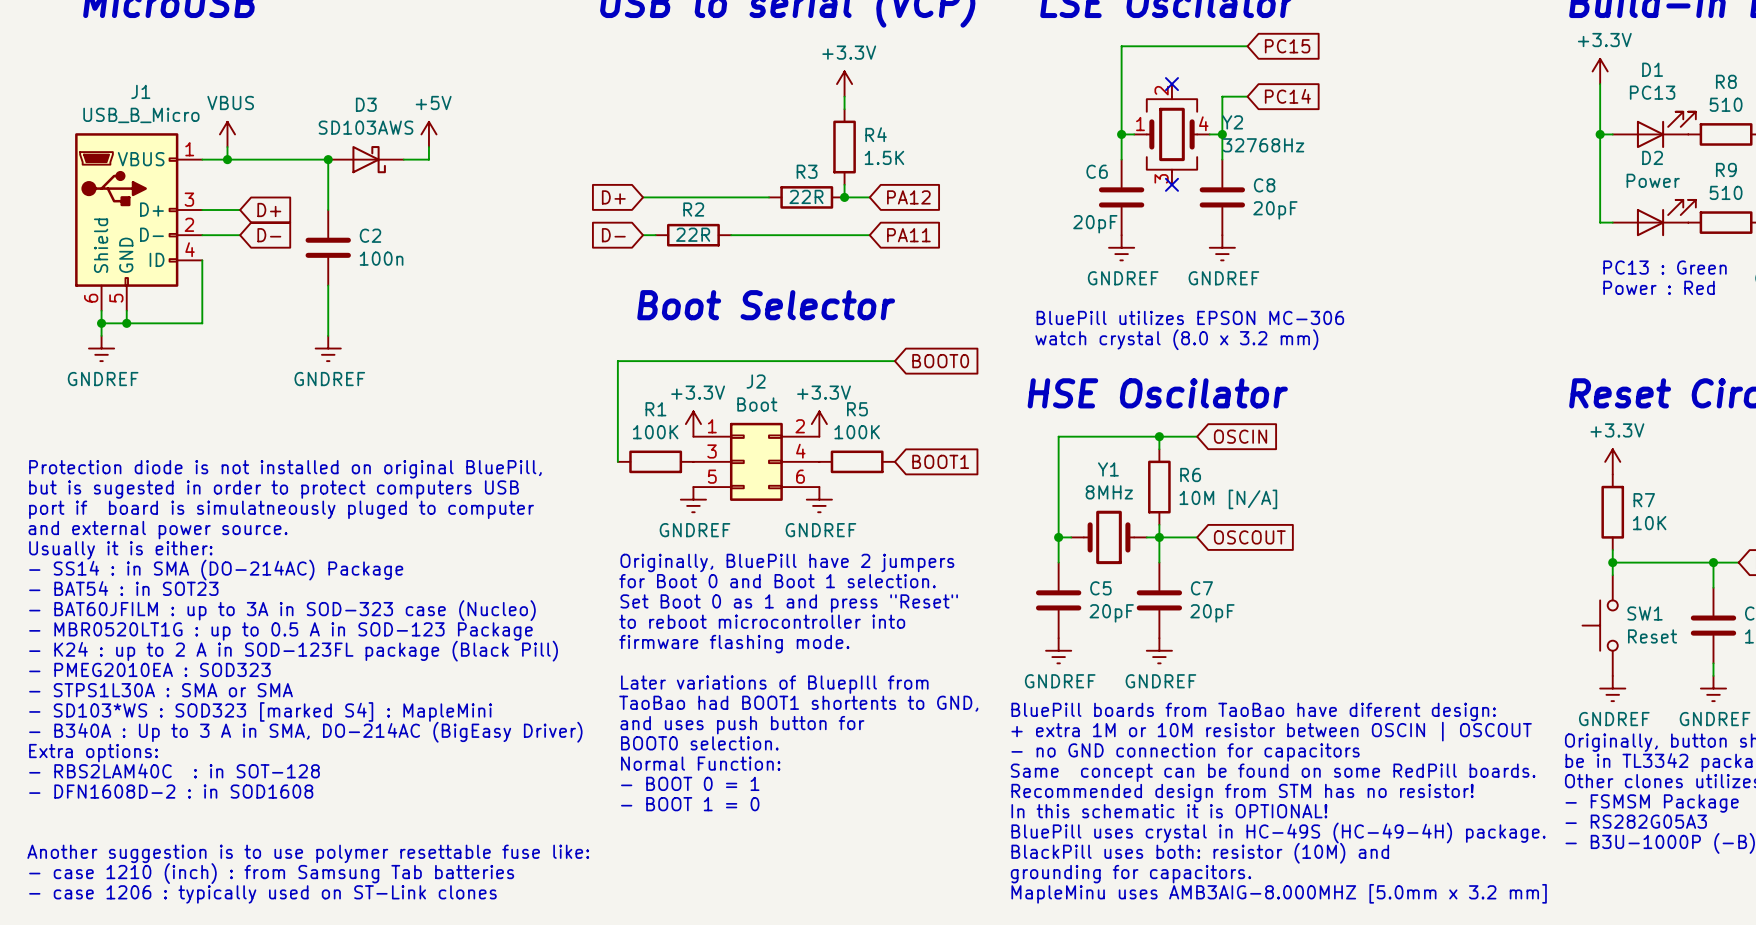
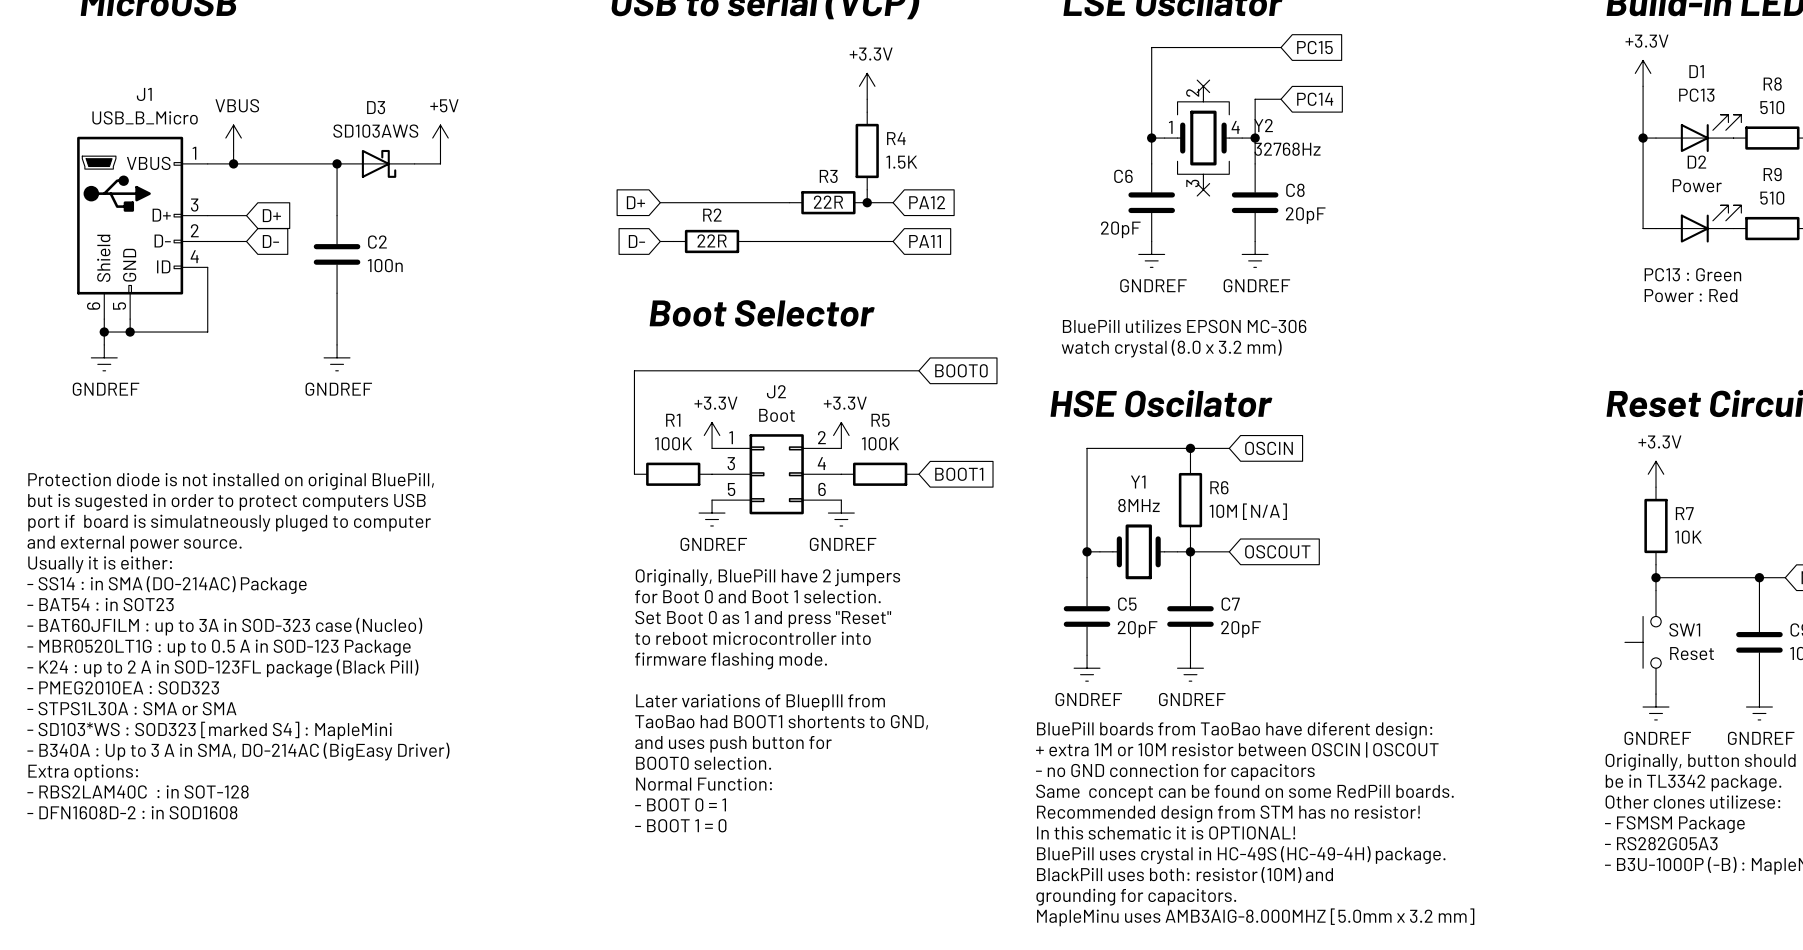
text: Another suggestion is to use polymer resettable fuse like: (308, 853) -> none
text: - case 1210 (inch) : from Samsung Tab batteries (271, 873) -> none
text: - case 1206 : typically used on ST-Link clones (262, 894) -> none

